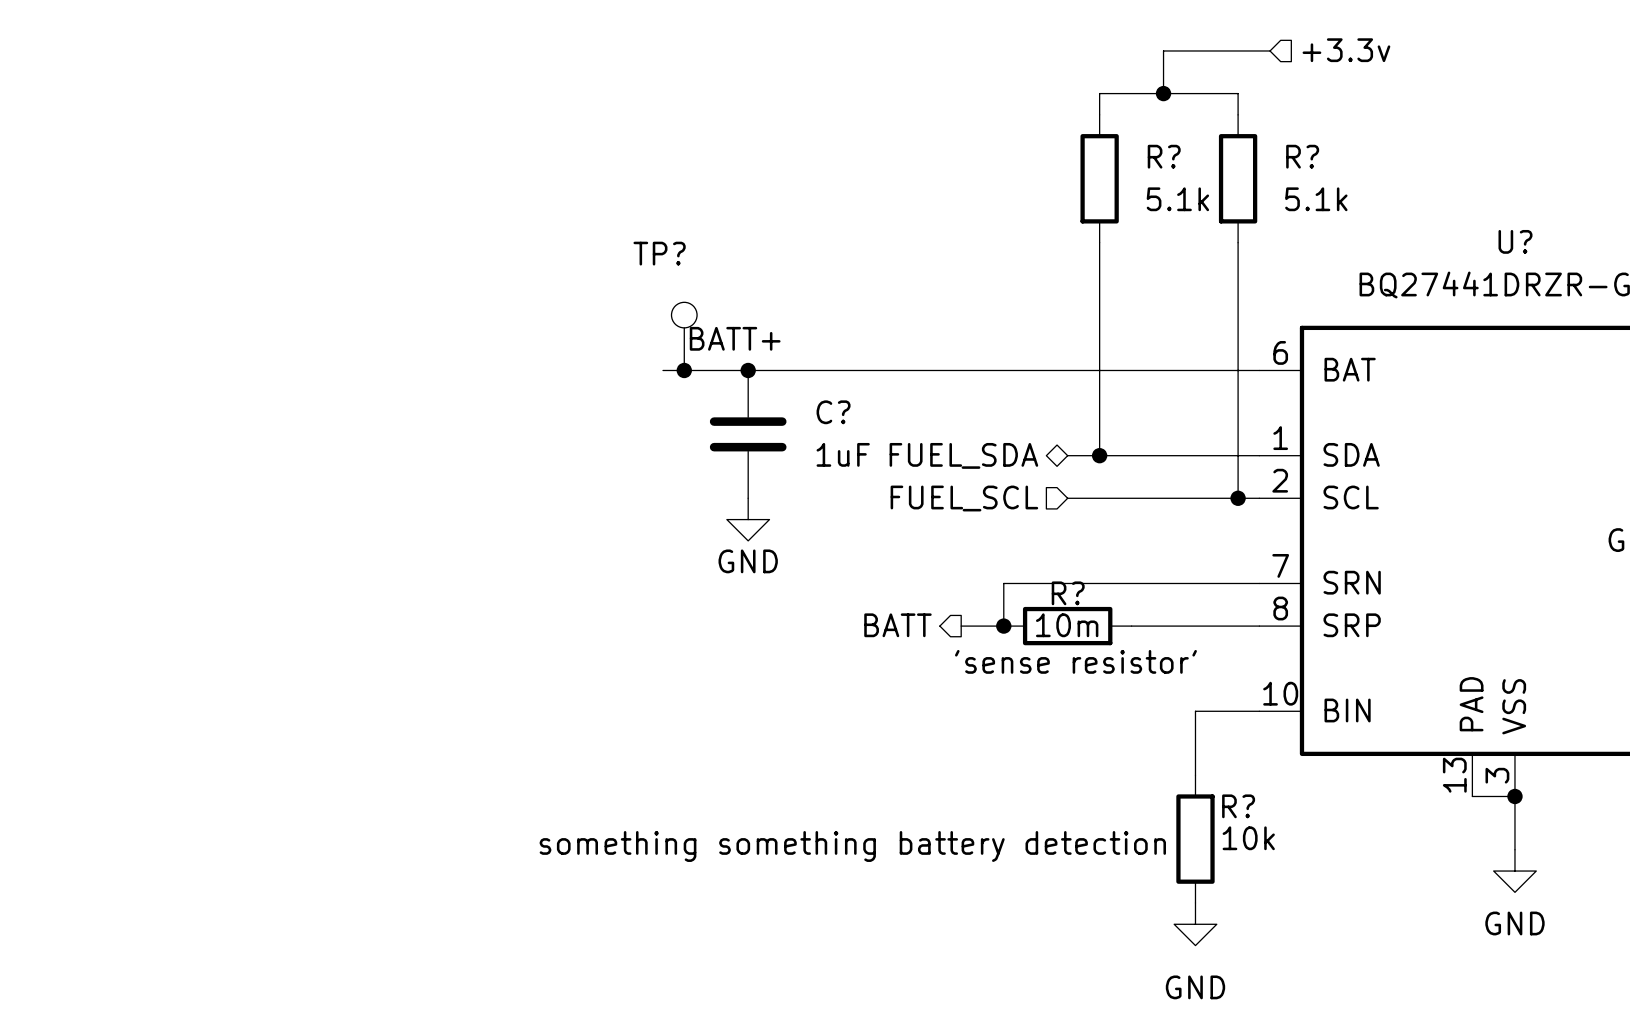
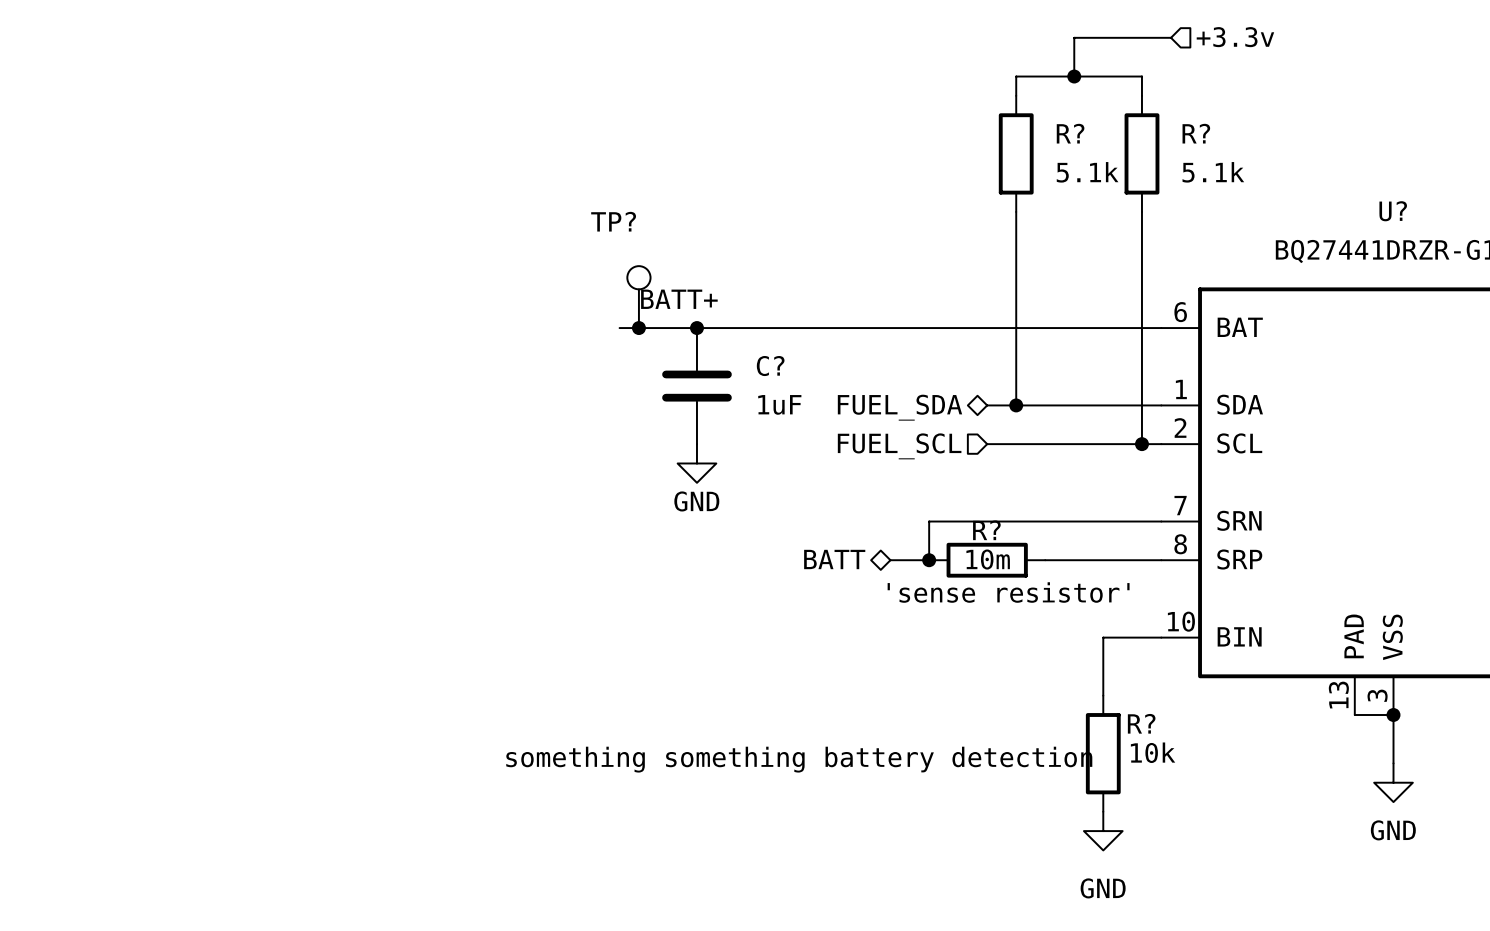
hierarchical label shape: output (897, 625) -> bidirectional (834, 559)

